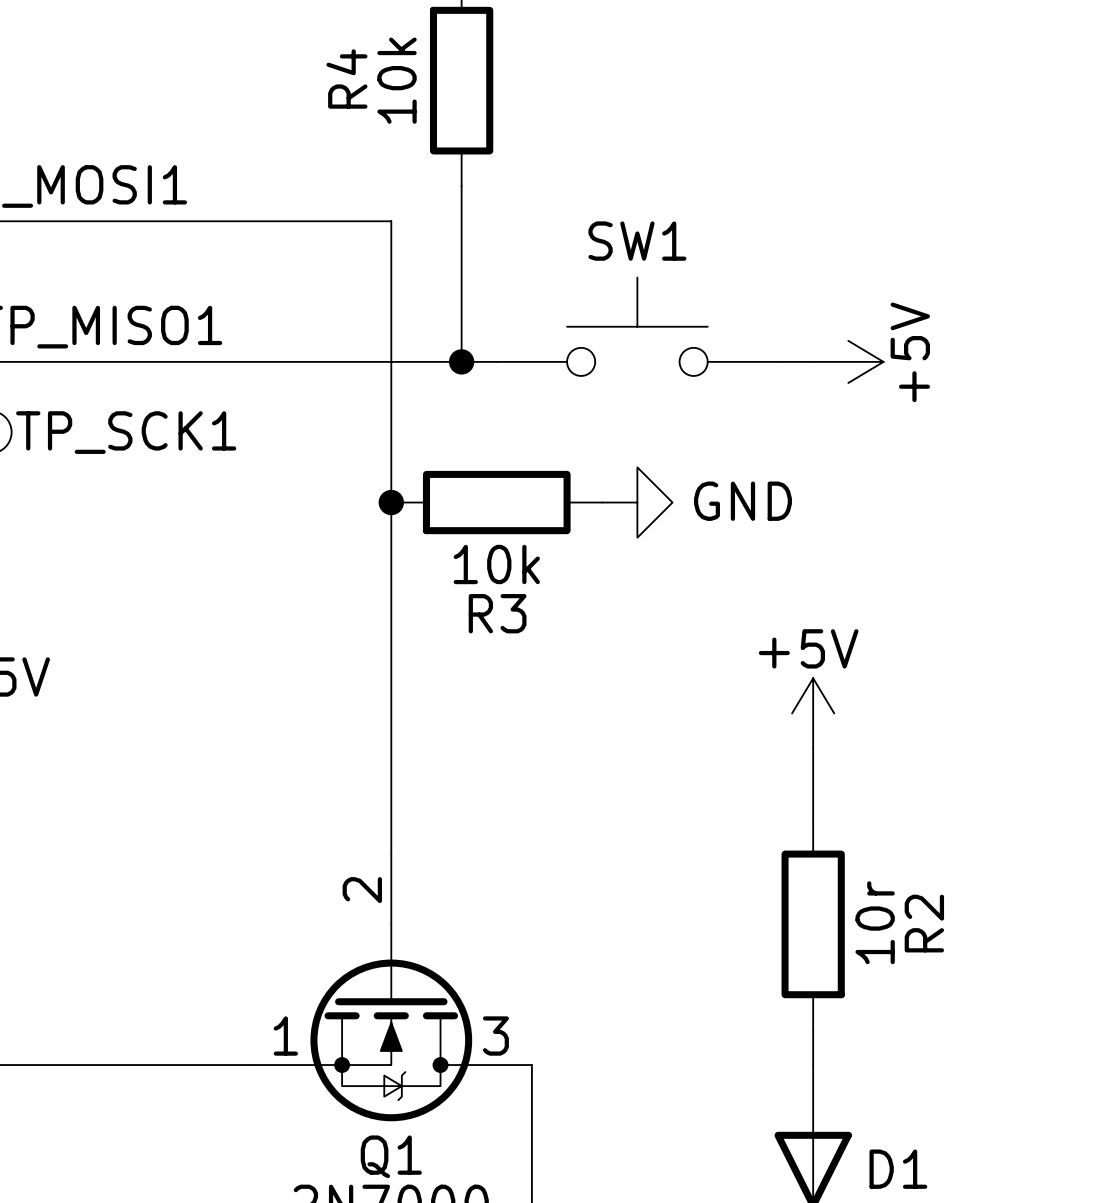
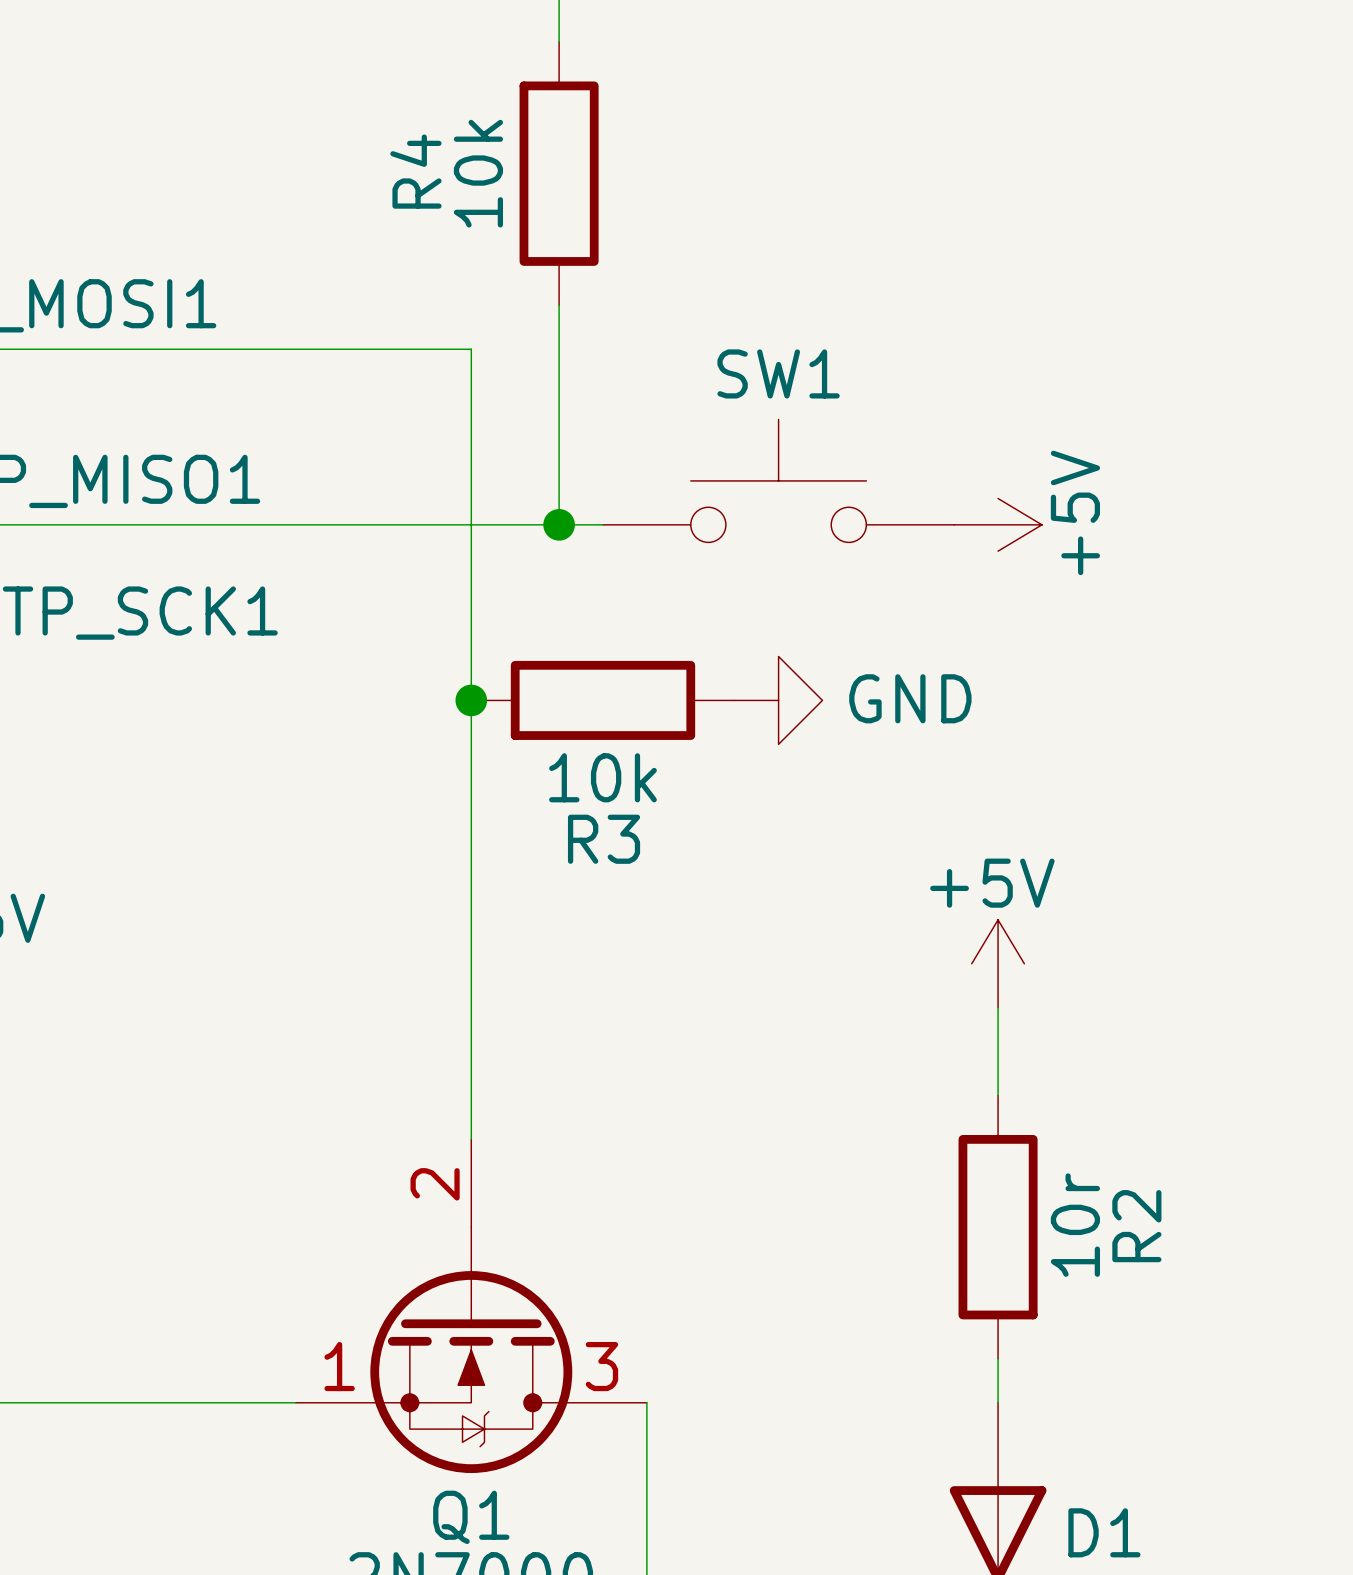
power symbol position: +5V (848, 361) -> +5V (998, 524)

